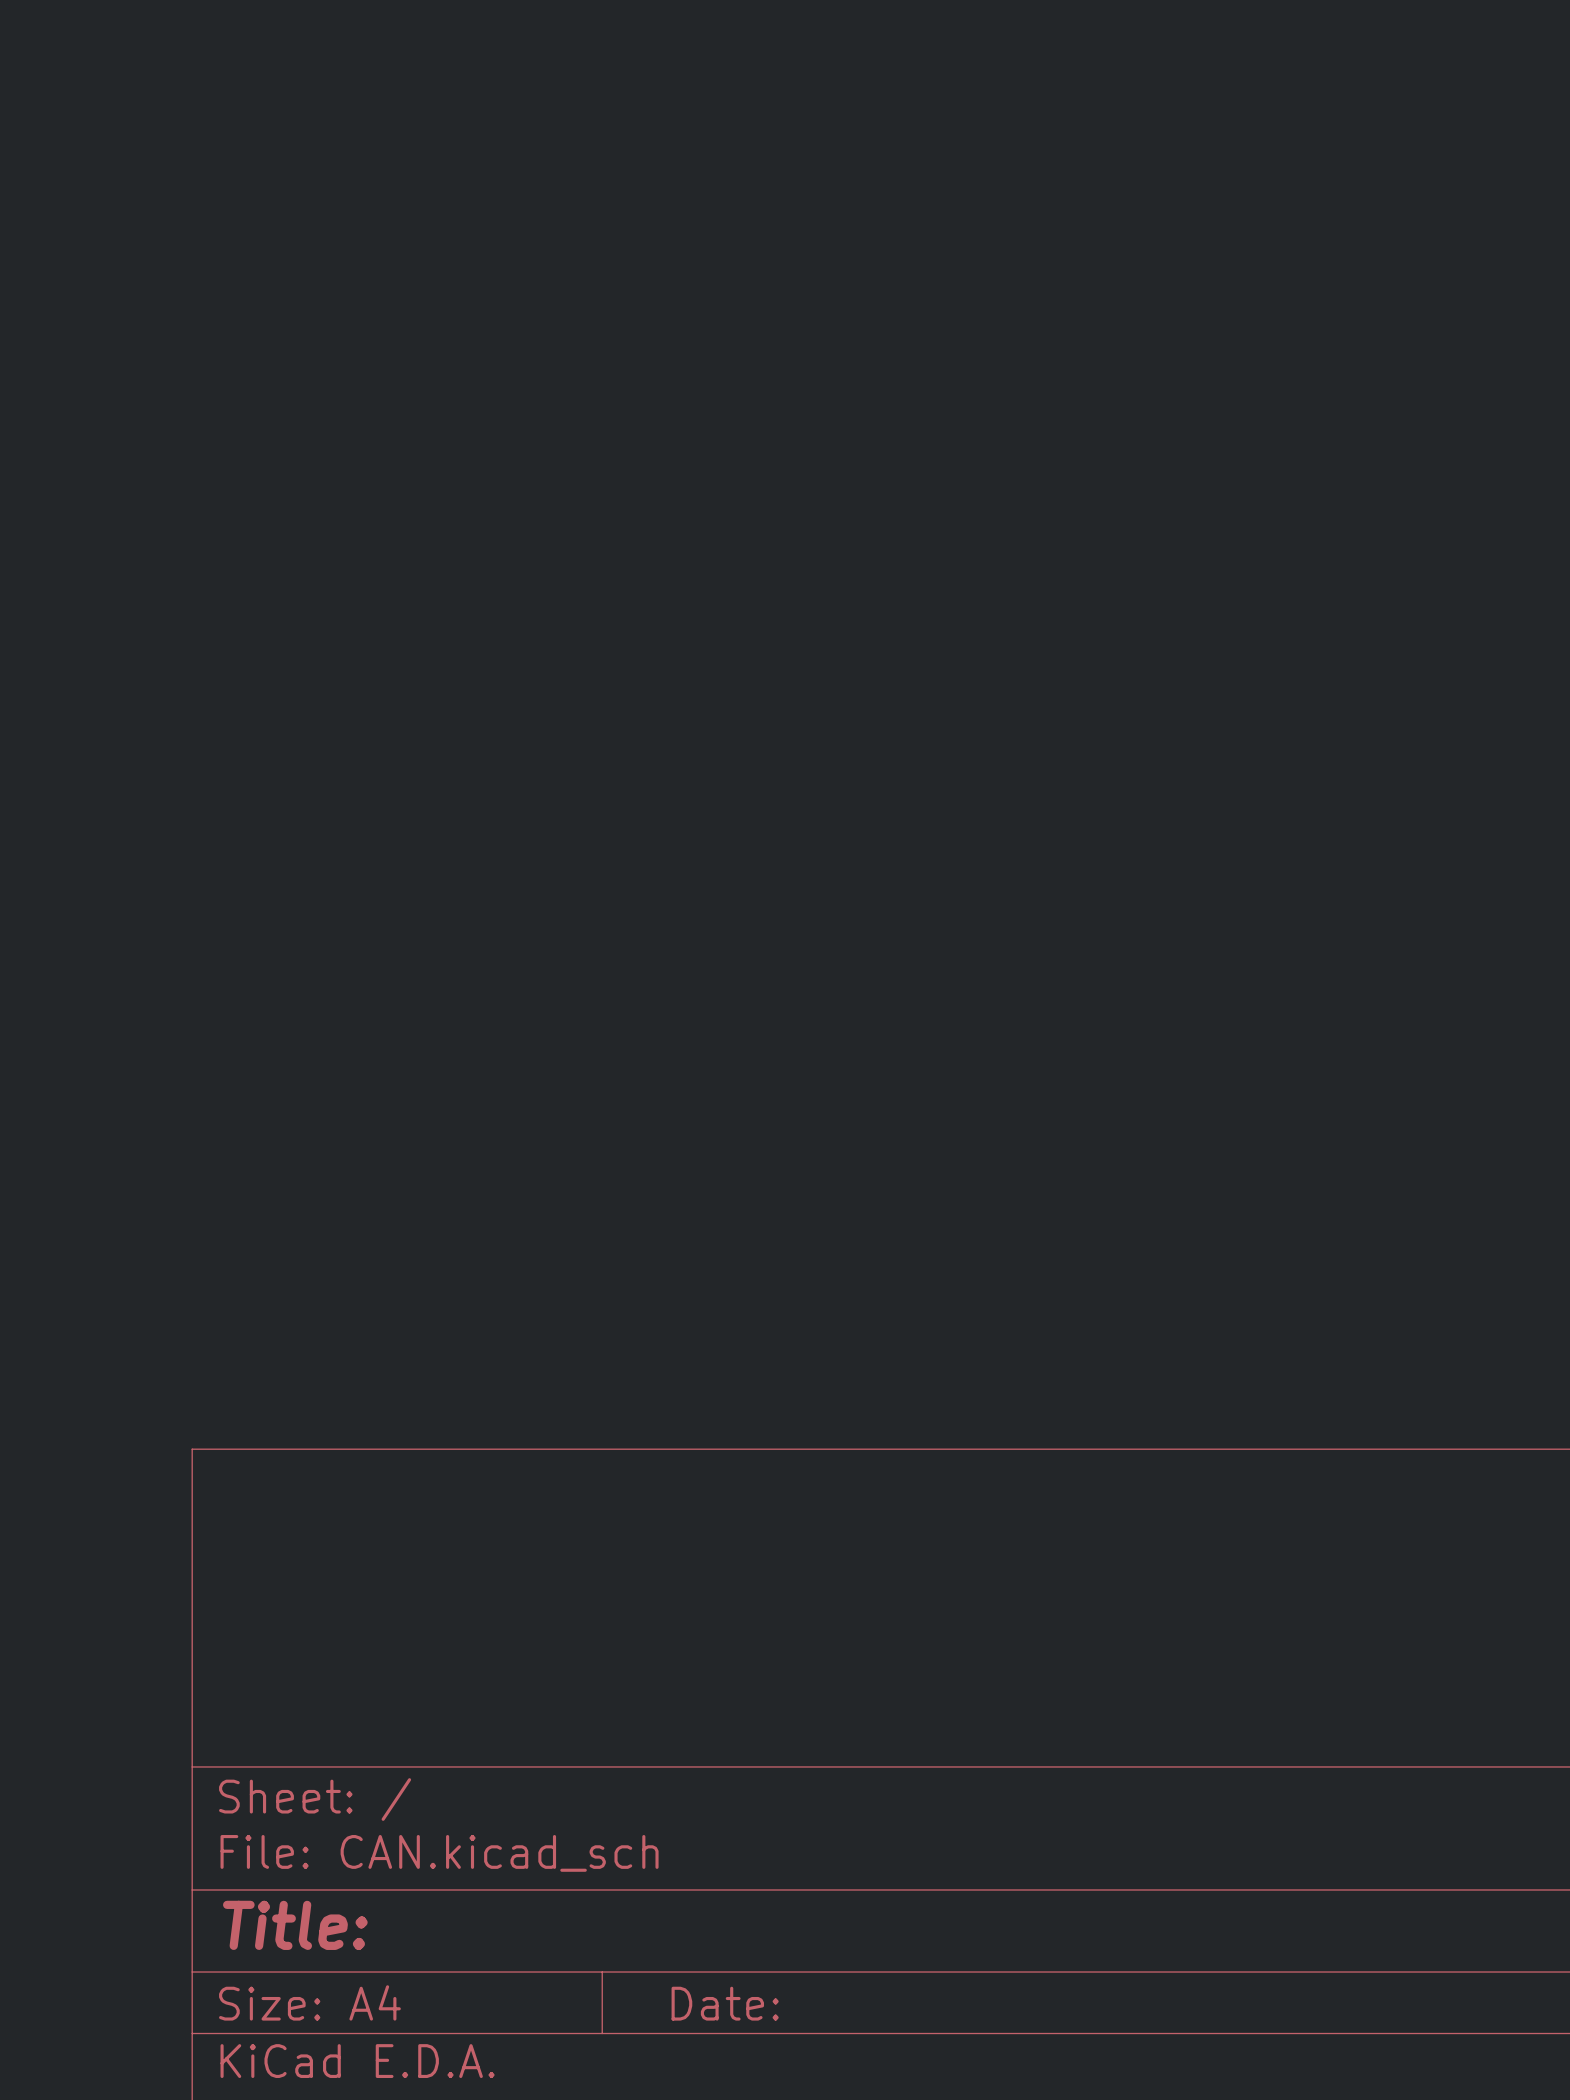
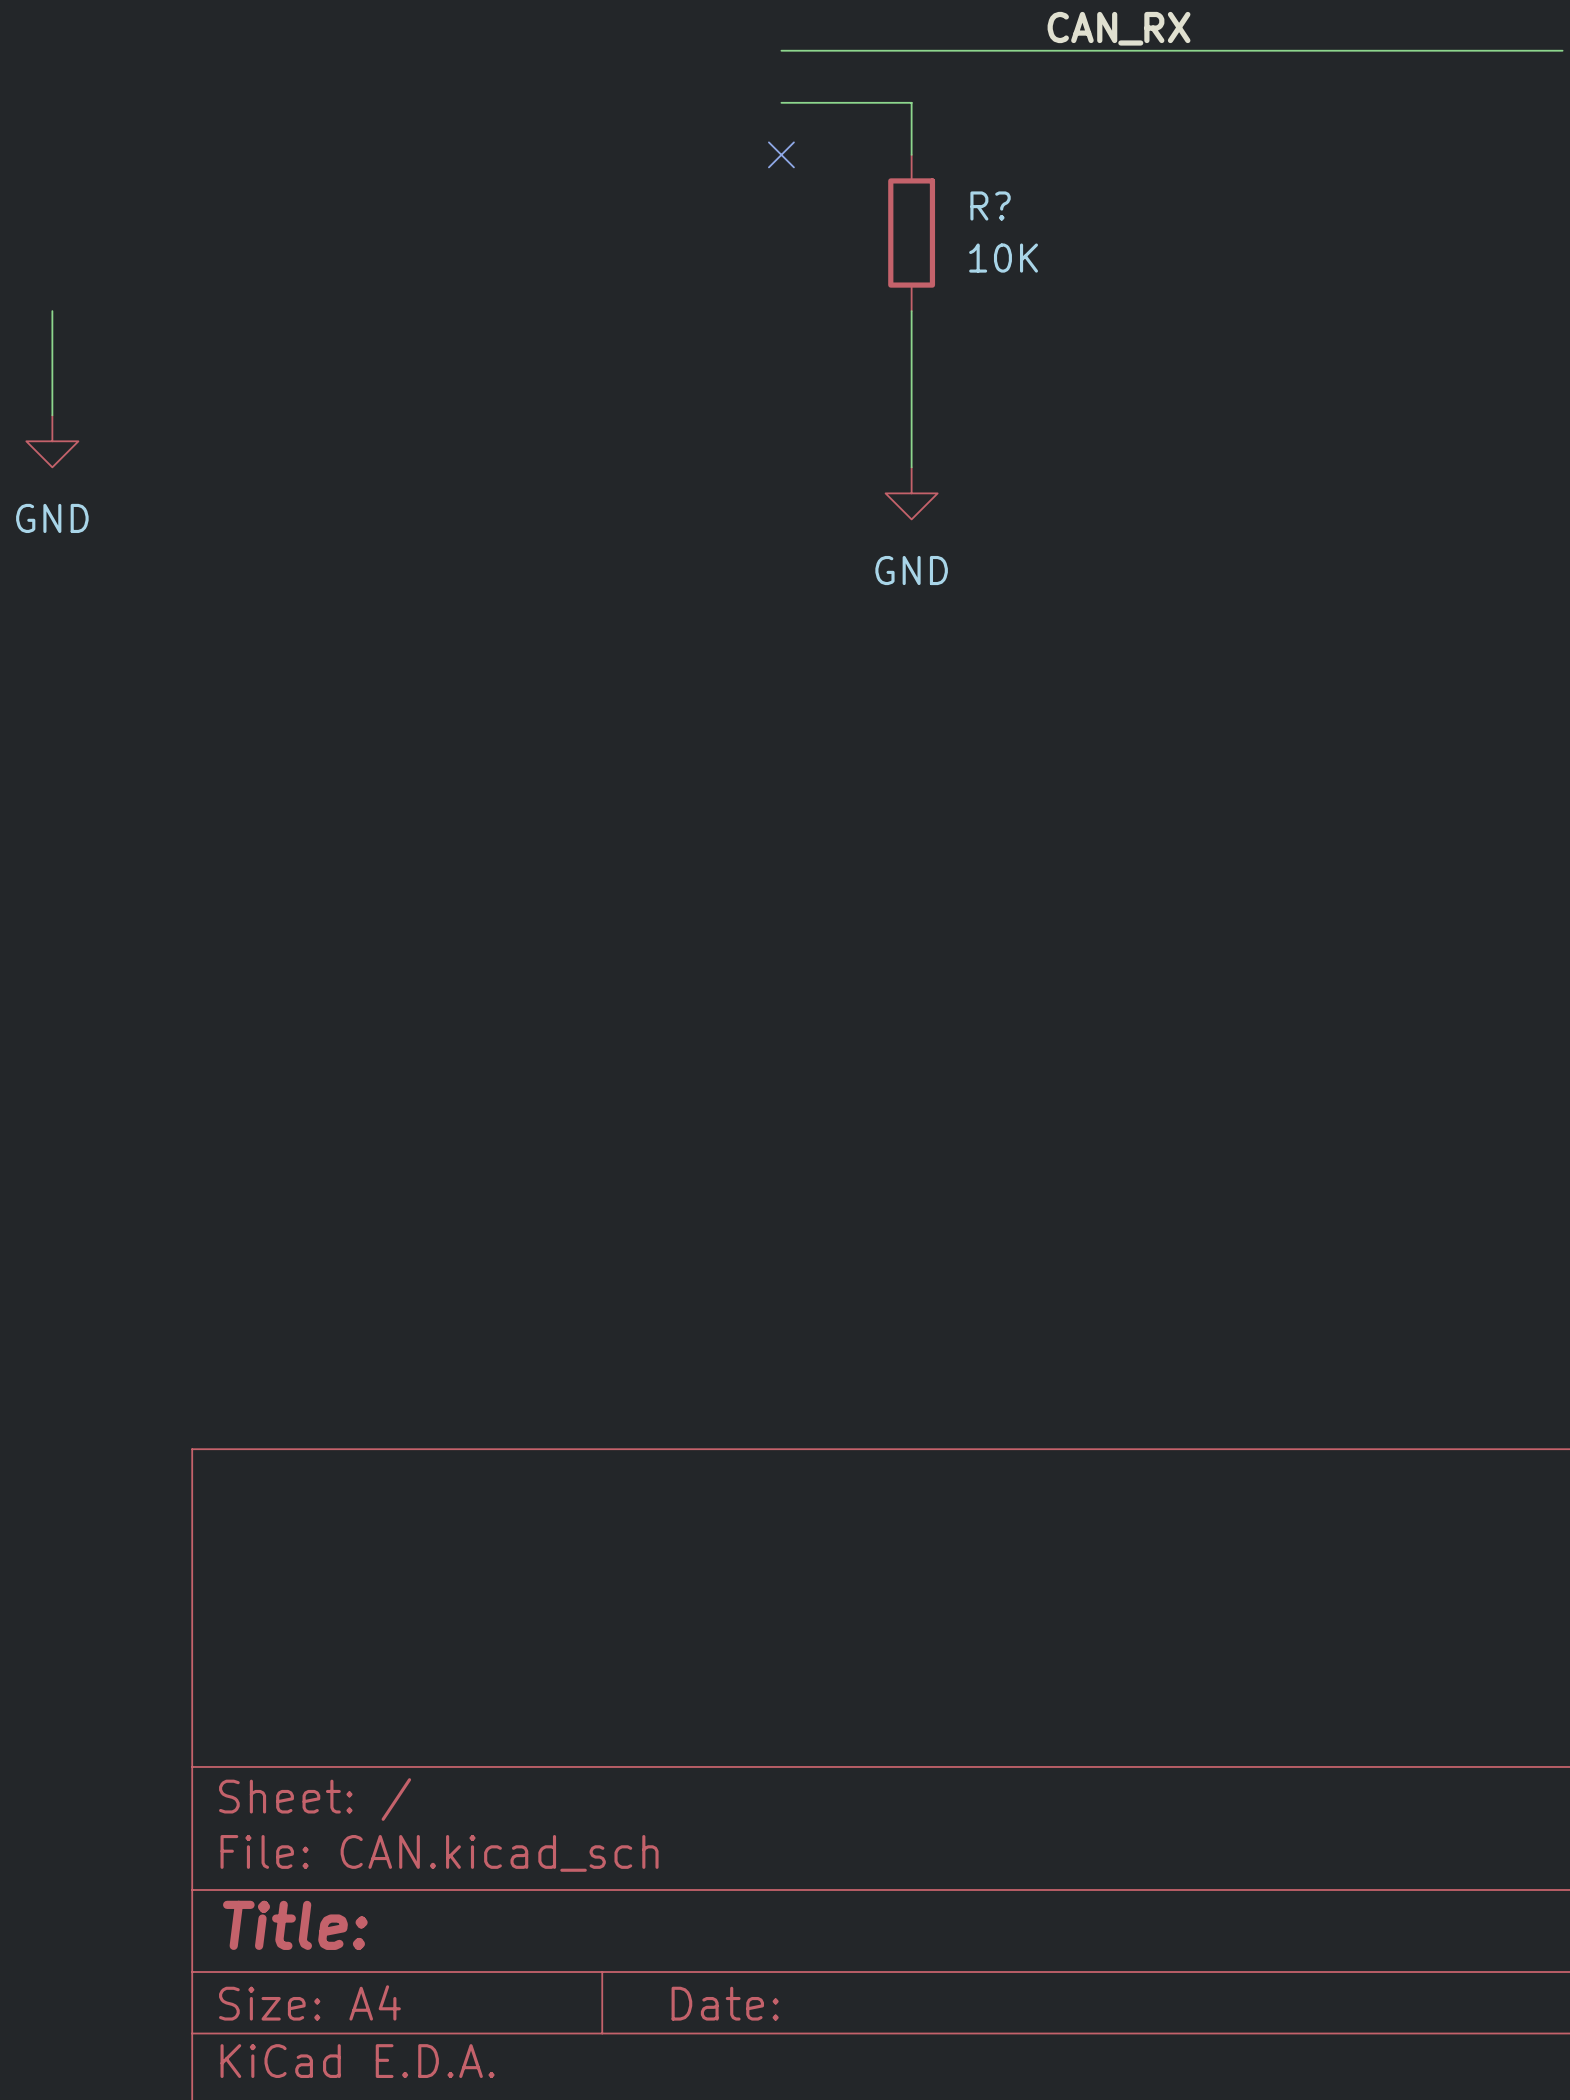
label: none -> CAN_RX (1119, 28)
wire: none -> (781, 50) (1562, 50)
wire: none -> (781, 102) (911, 102) (911, 154)
no-connect mark: none -> (781, 154)
R?: none -> 10K (911, 233)
wire: none -> (52, 311) (52, 415)
wire: none -> (911, 311) (911, 467)
power symbol: none -> GND (52, 441)
power symbol: none -> GND (911, 493)

